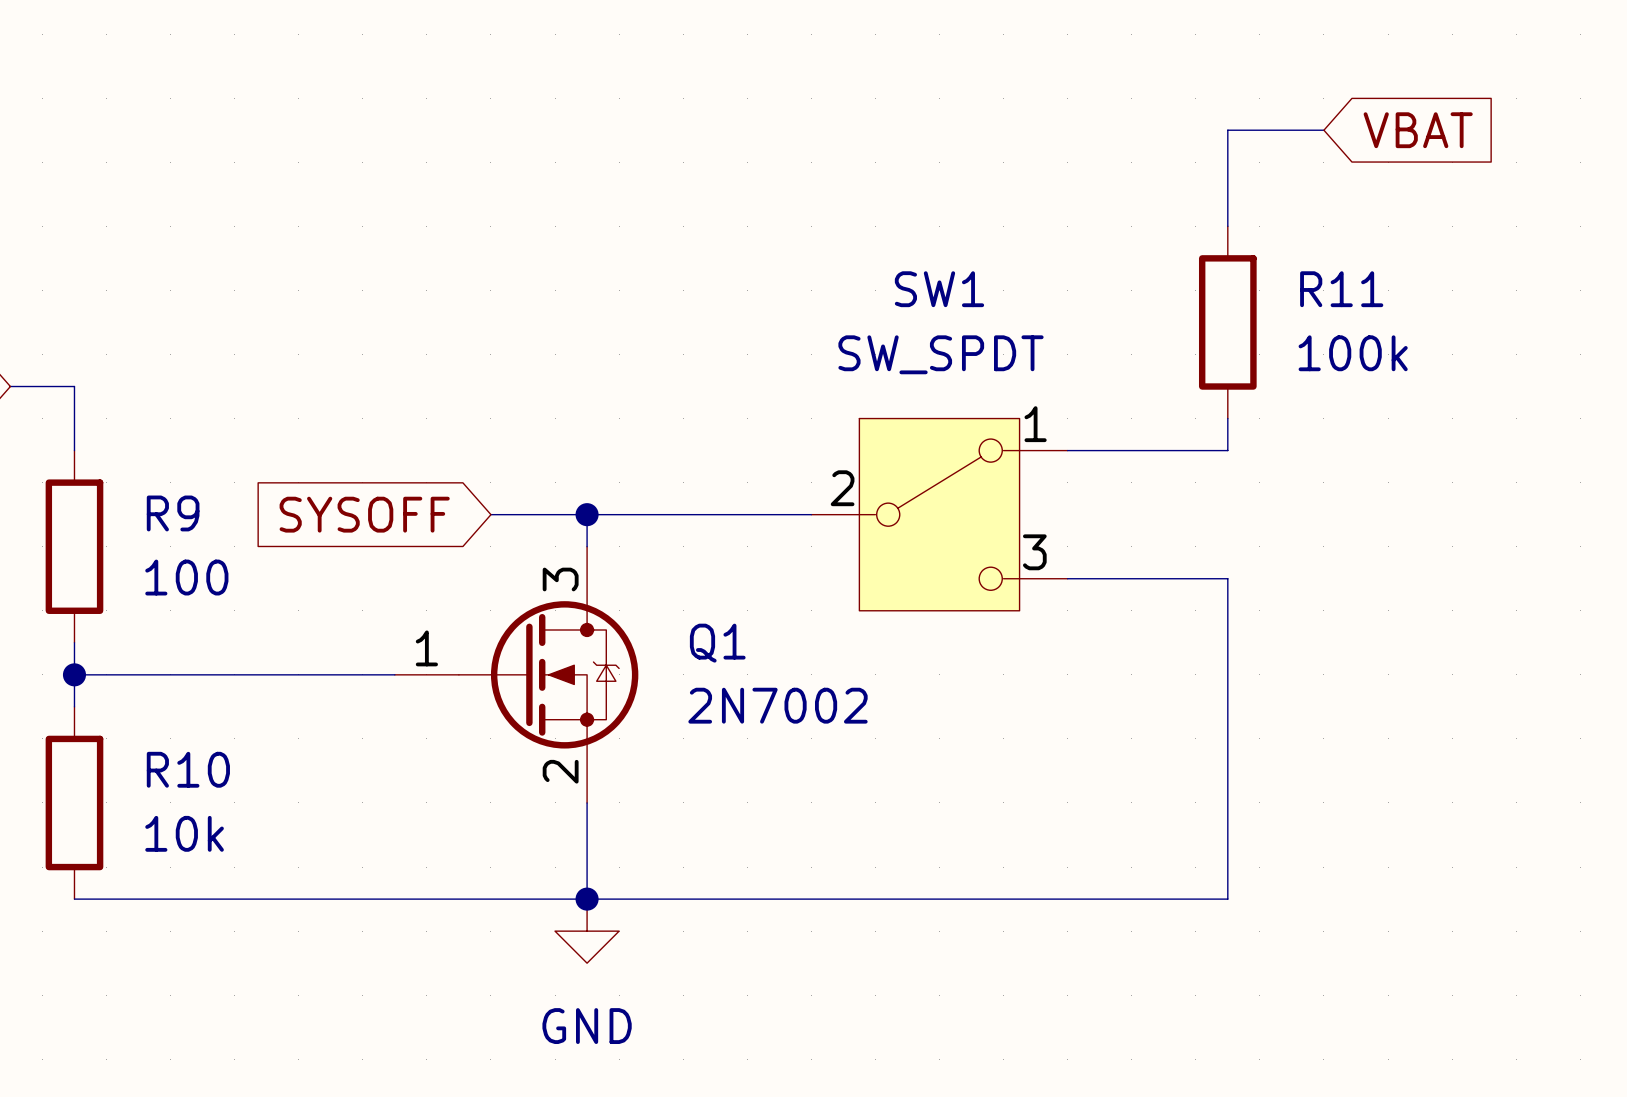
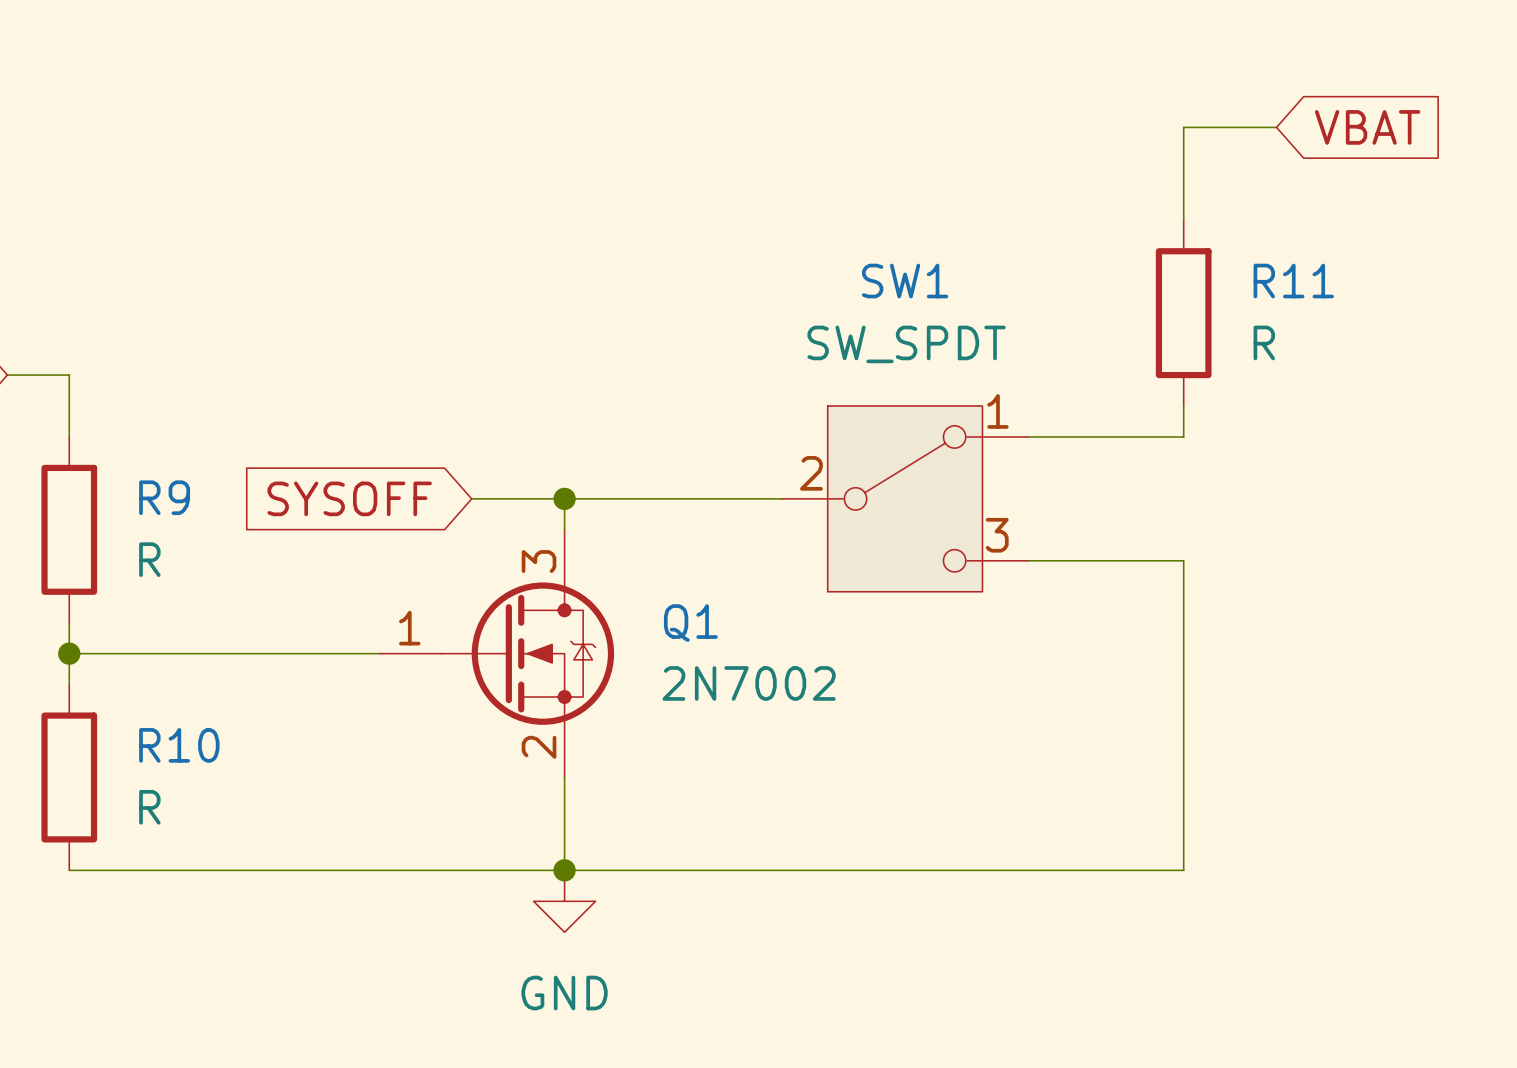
R11 value: 100k (1353, 353) -> R (1264, 342)
R9 value: 100 (186, 577) -> R (149, 559)
R10 value: 10k (184, 833) -> R (149, 807)

